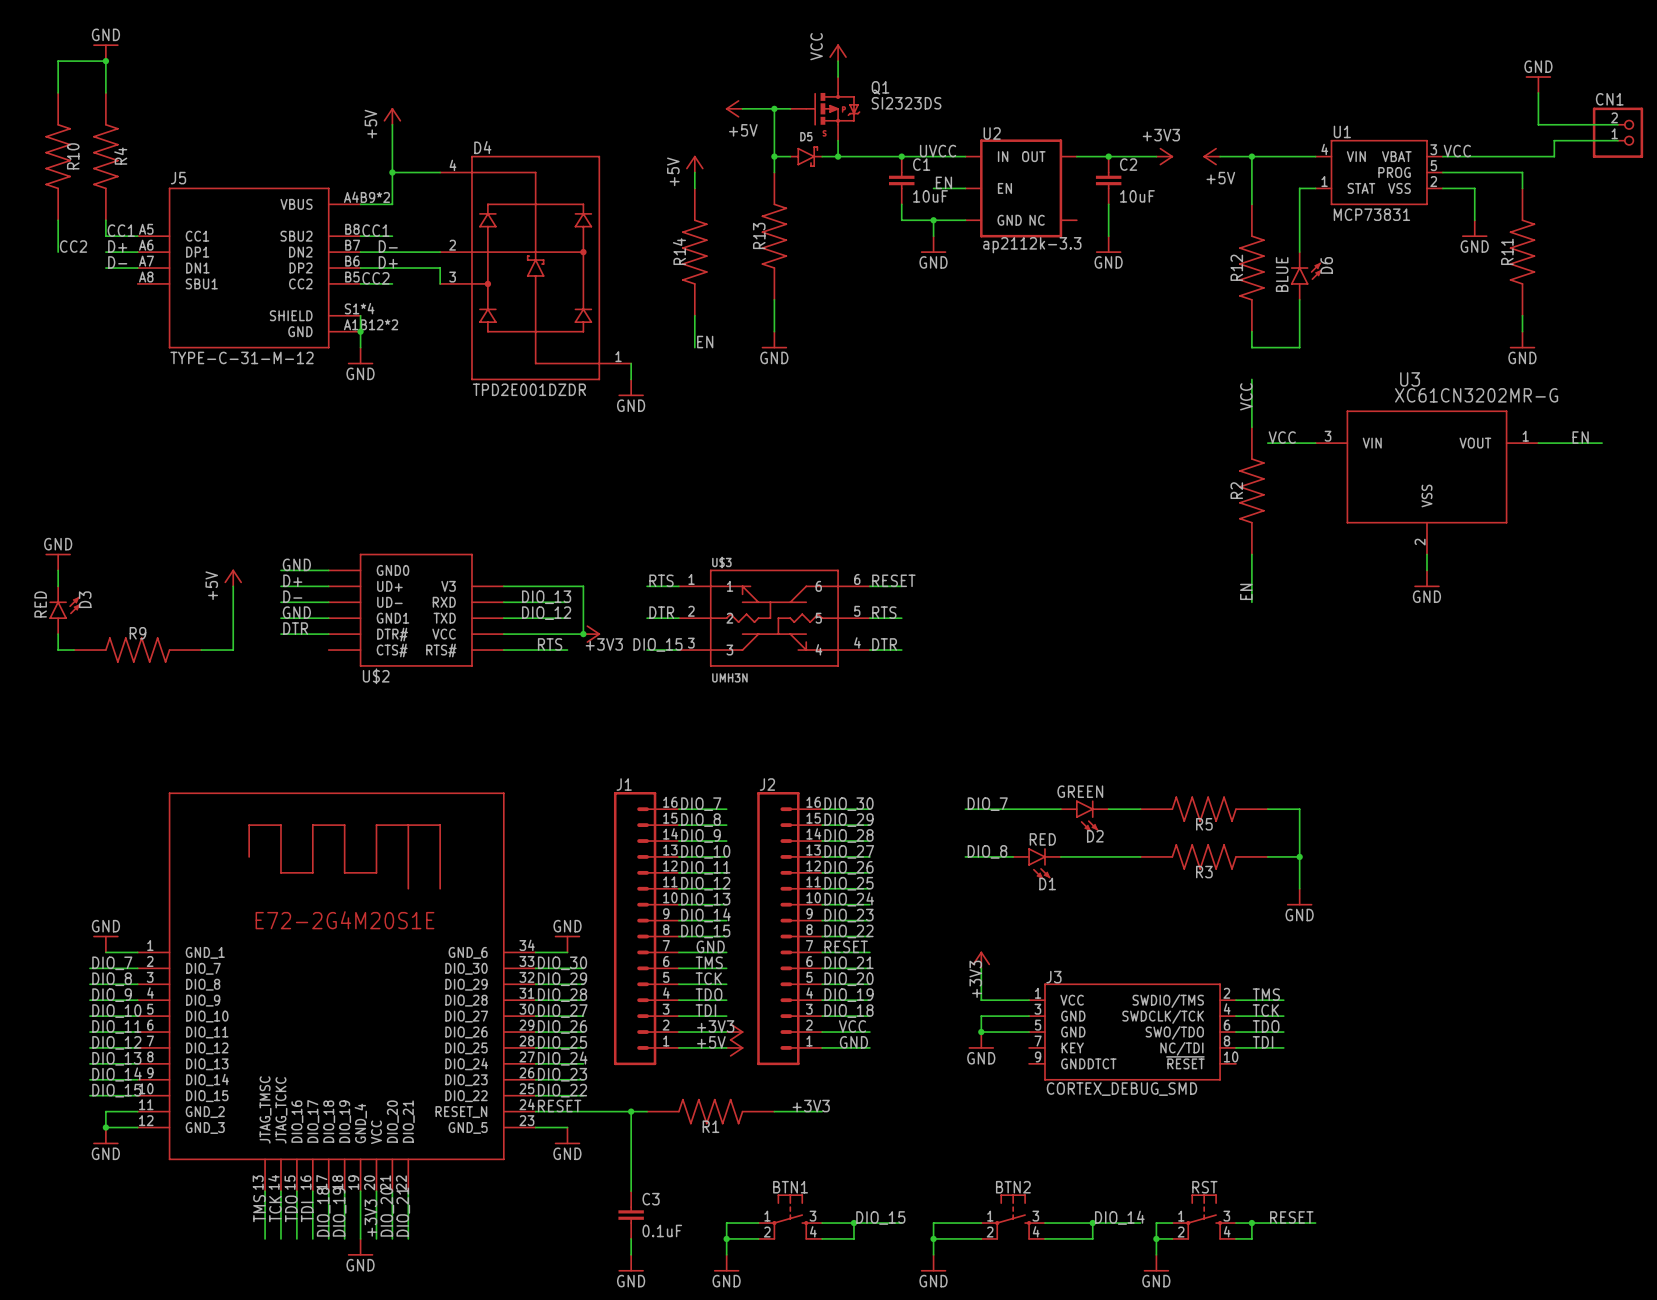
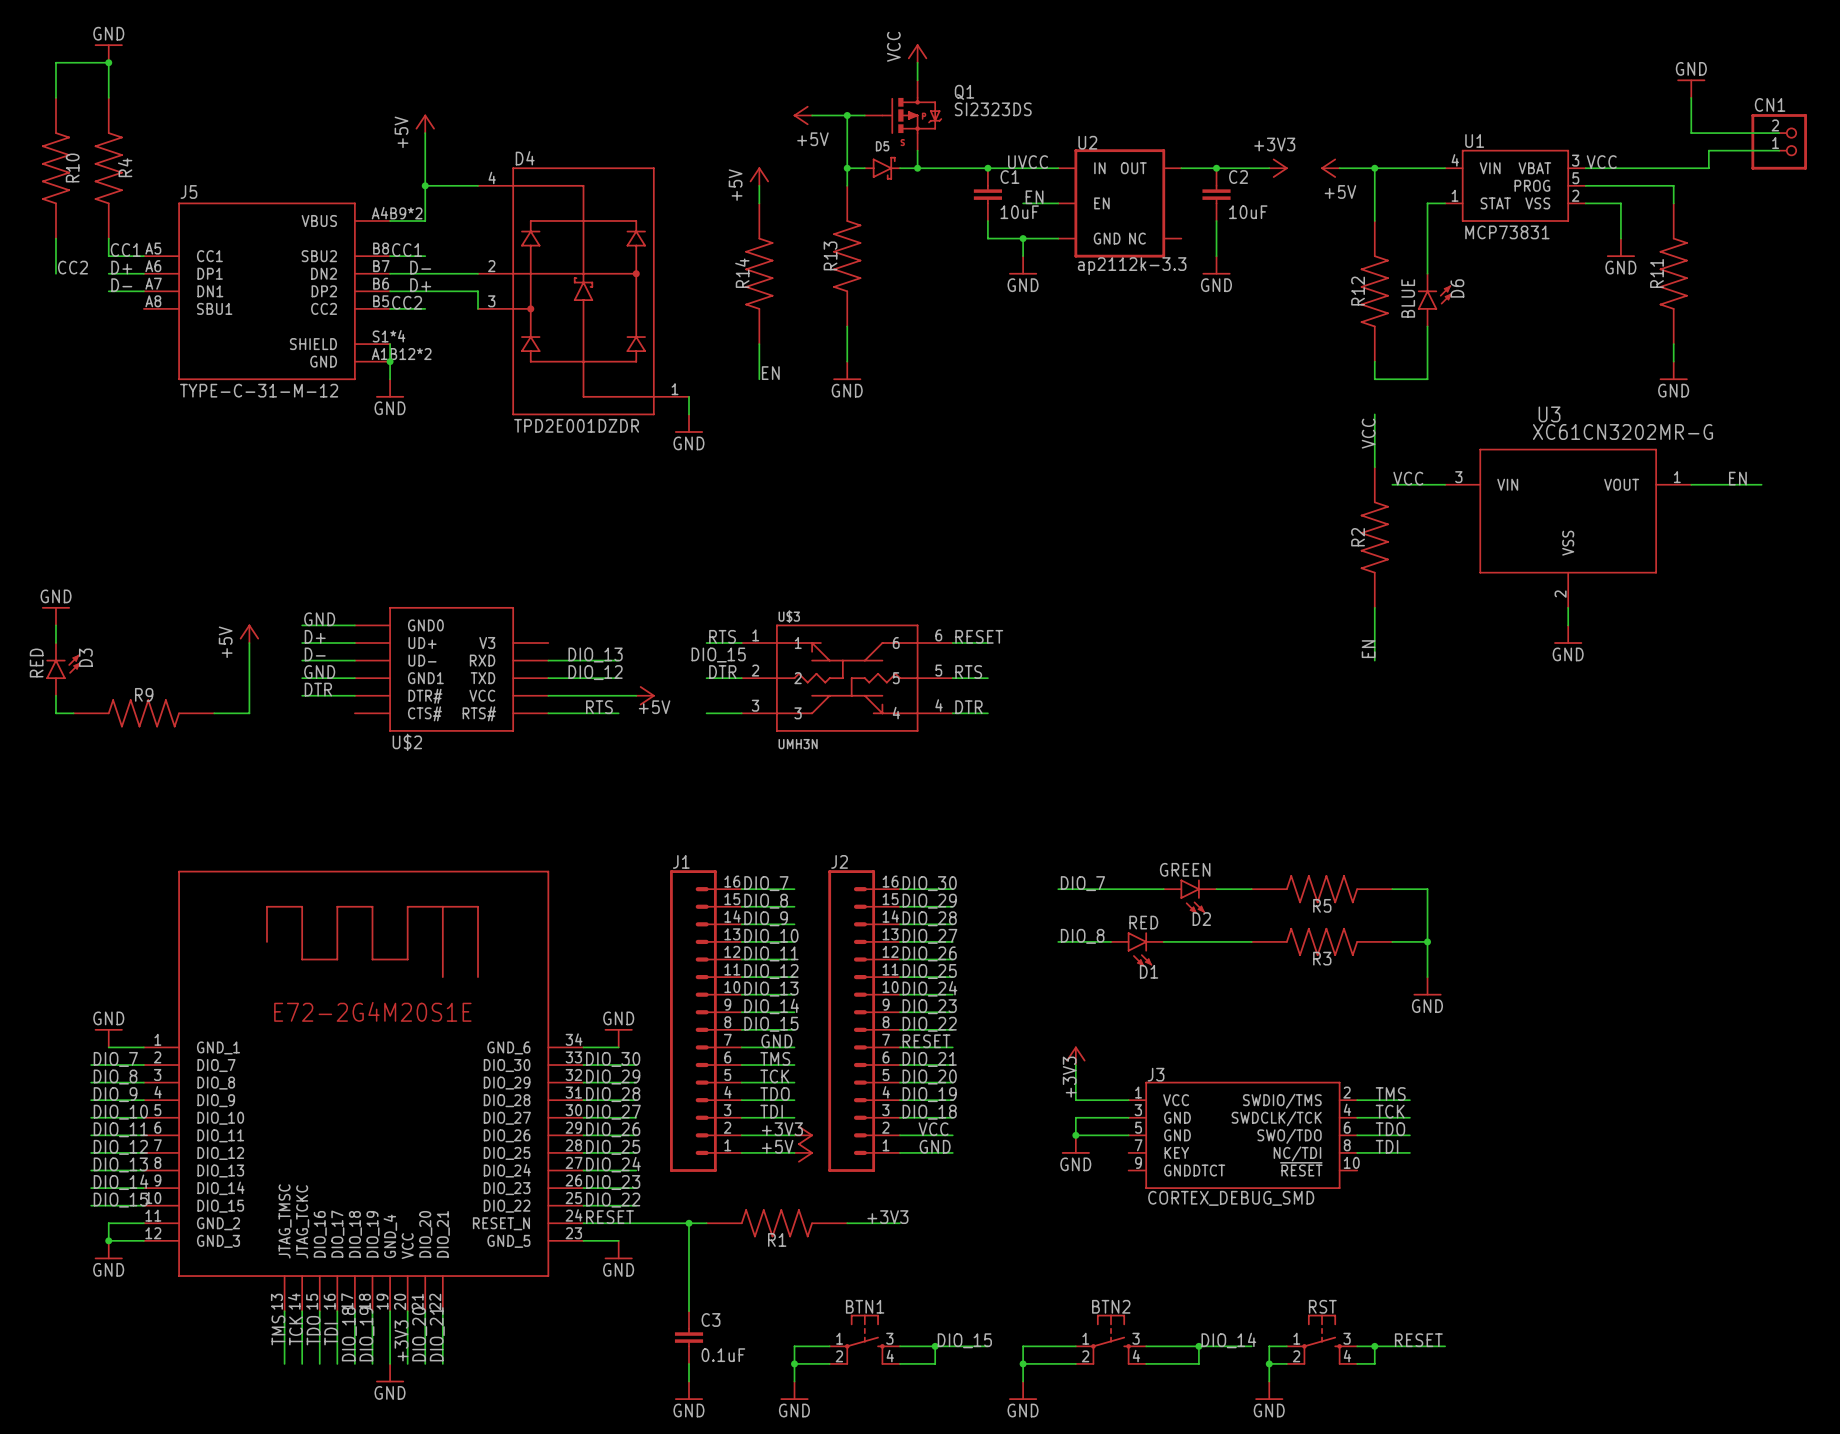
wire: (503, 586) (583, 586) (583, 634) -> none
junction: (583, 634) -> none
power symbol: +3V3 (591, 634) -> +5V (645, 695)
label position: DIO_15 (658, 644) -> DIO_15 (718, 655)

